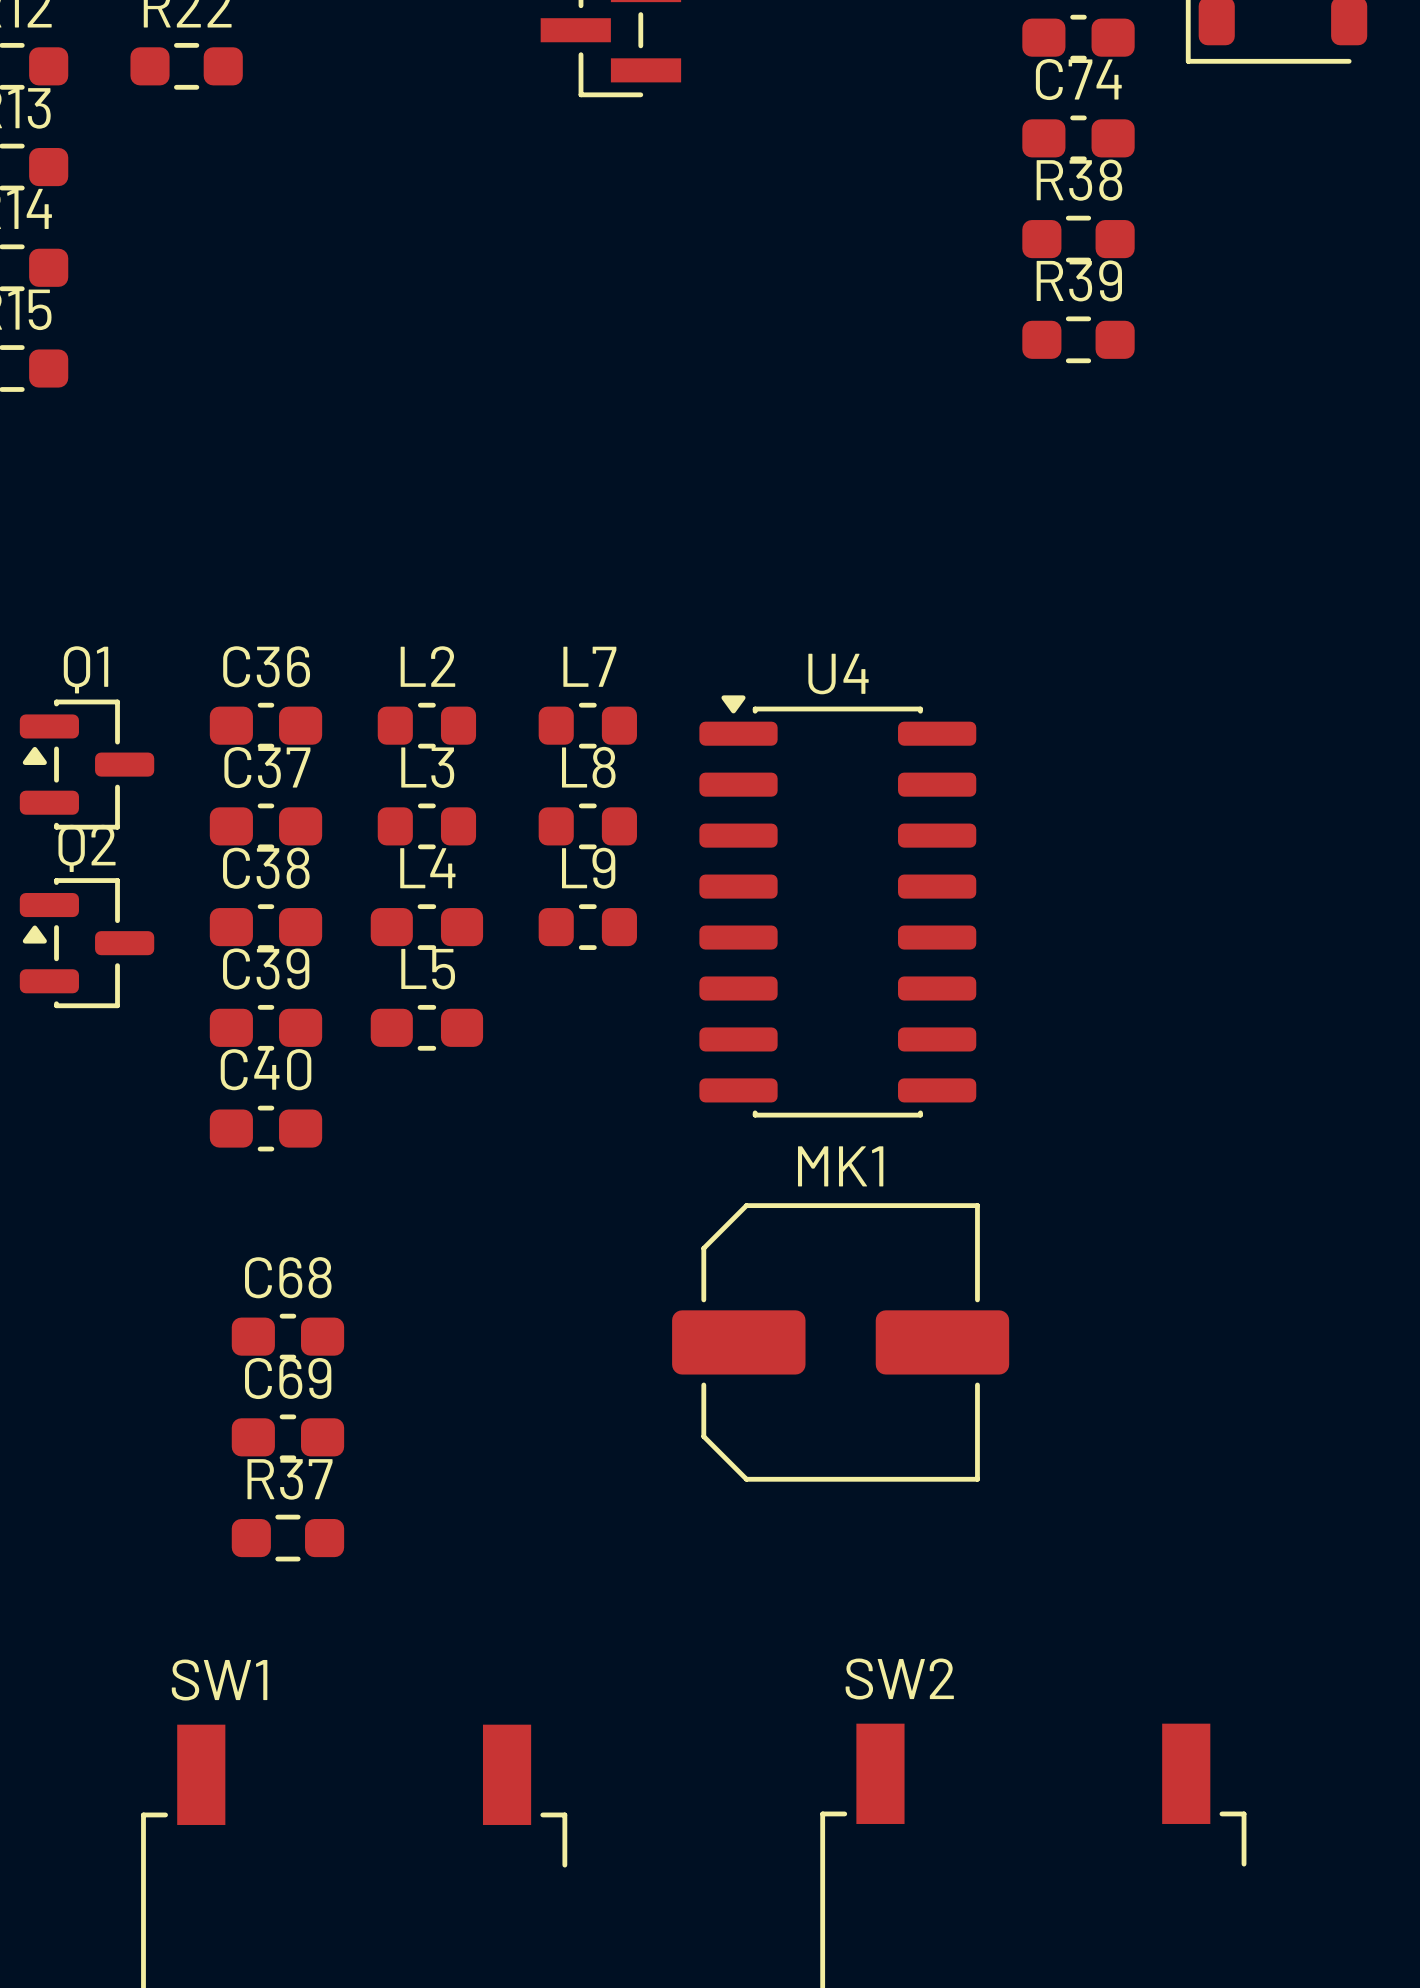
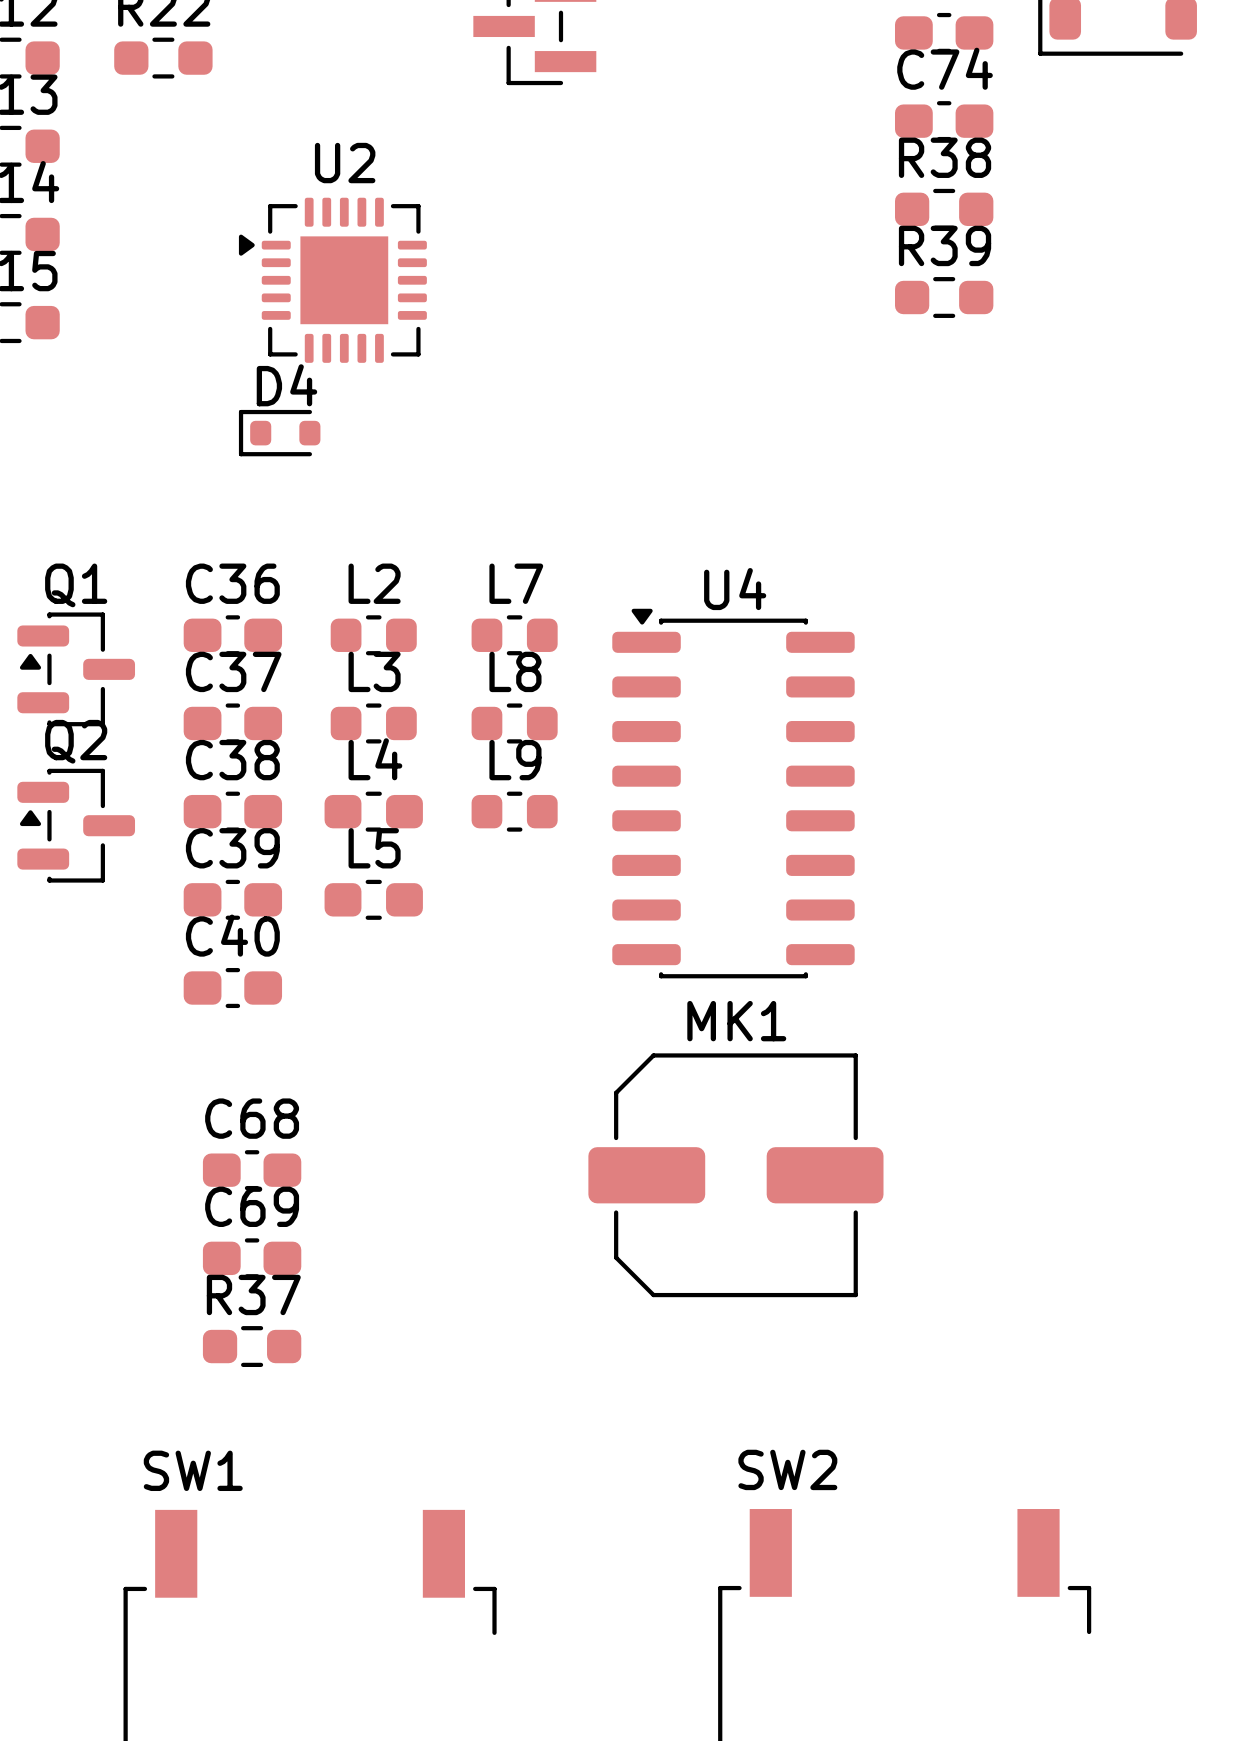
U2: none -> (332, 280)
D4: none -> (279, 433)

